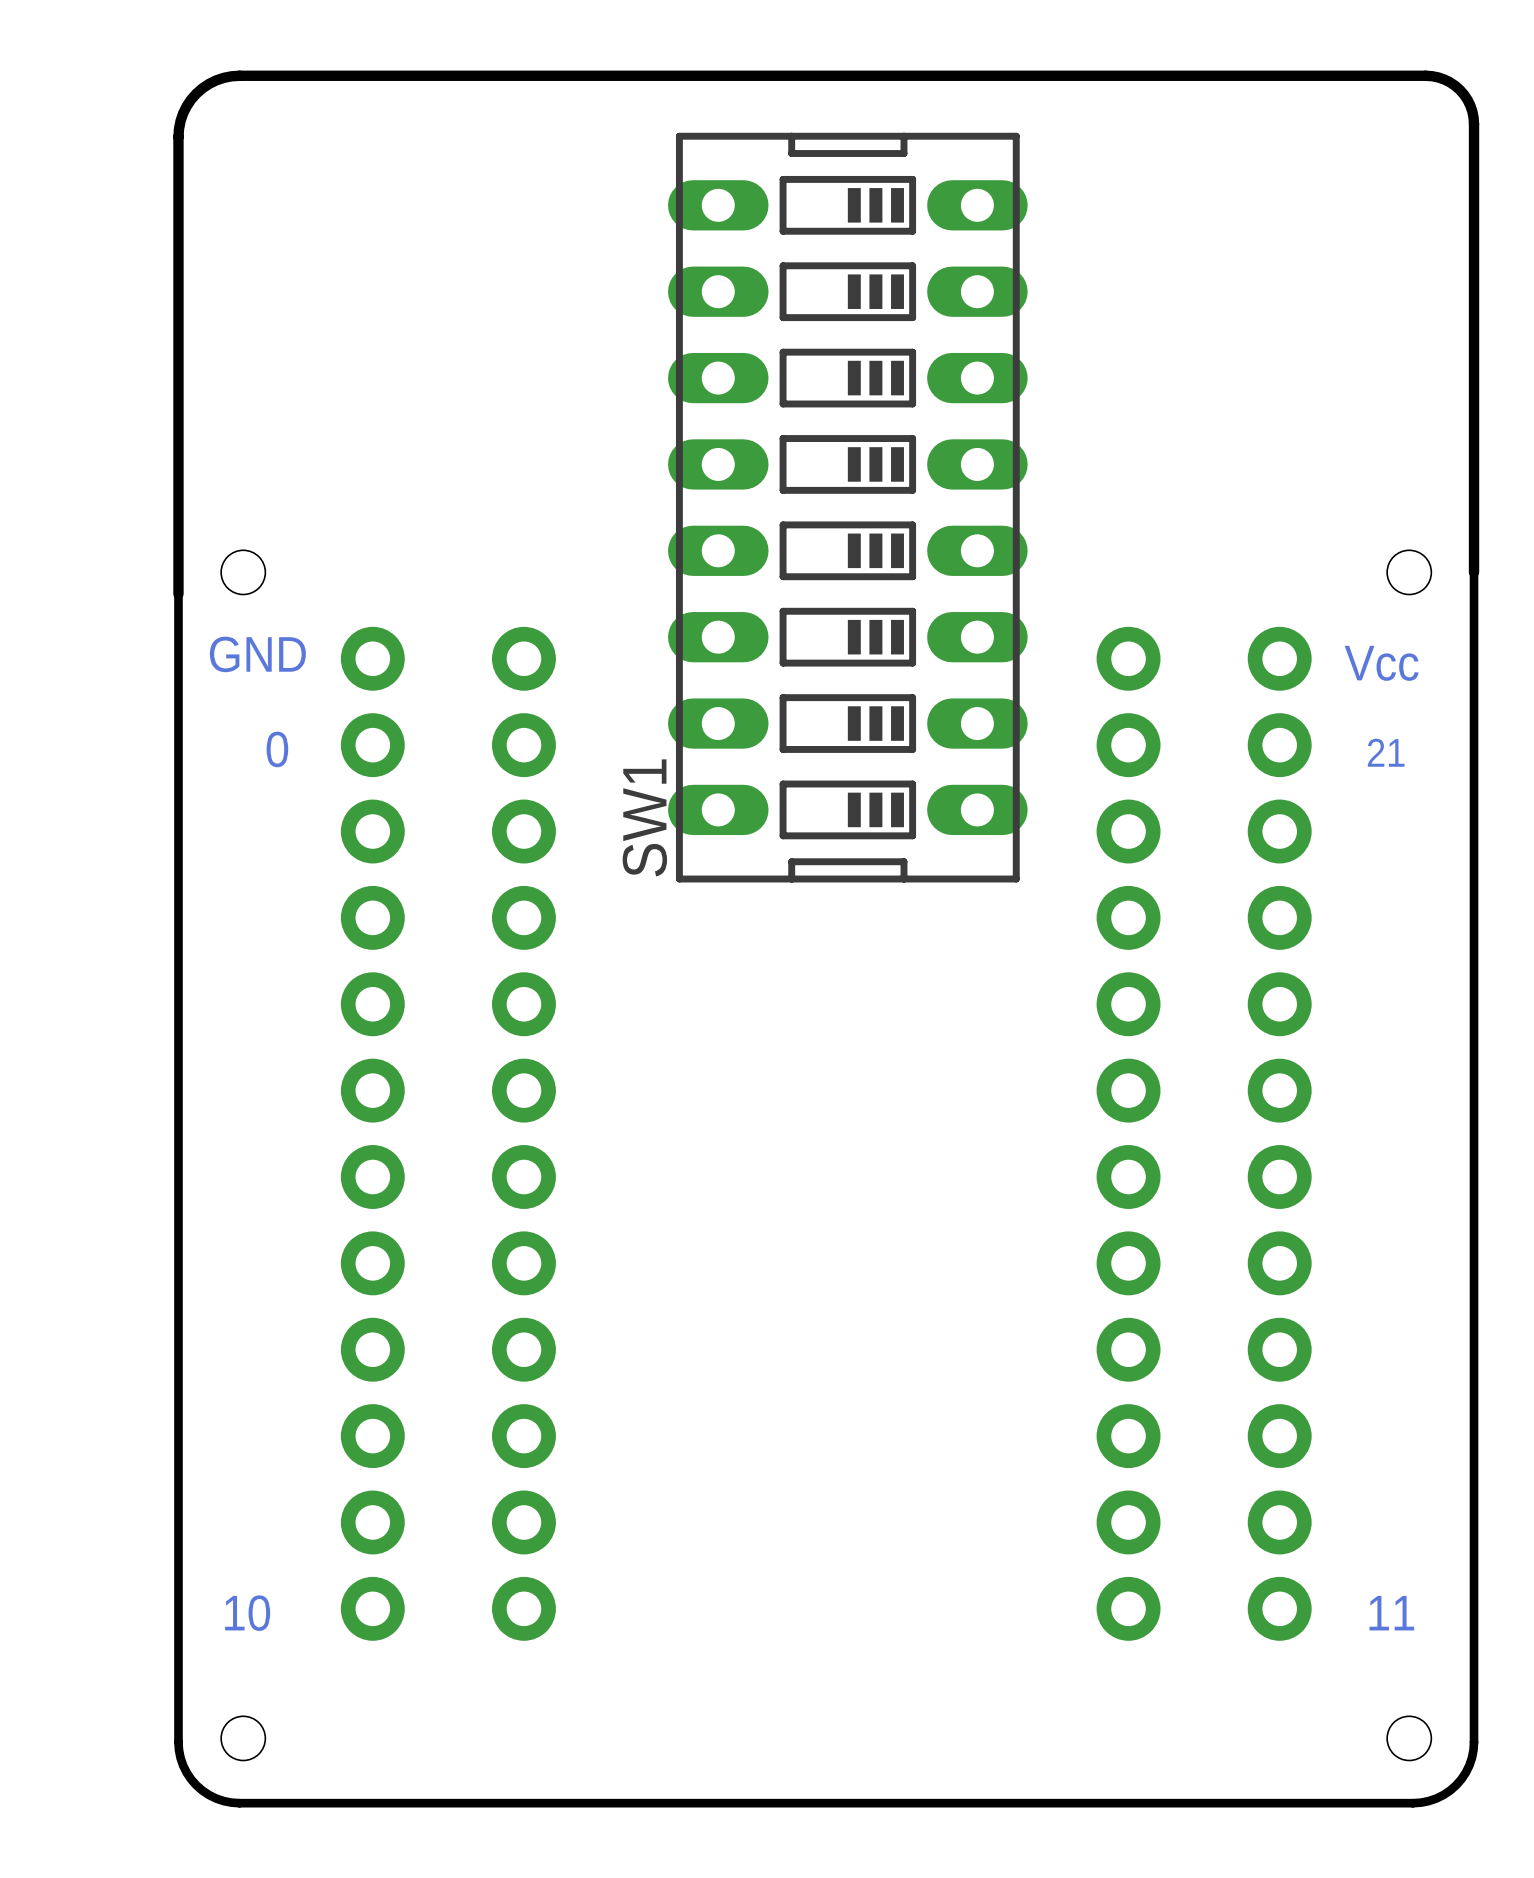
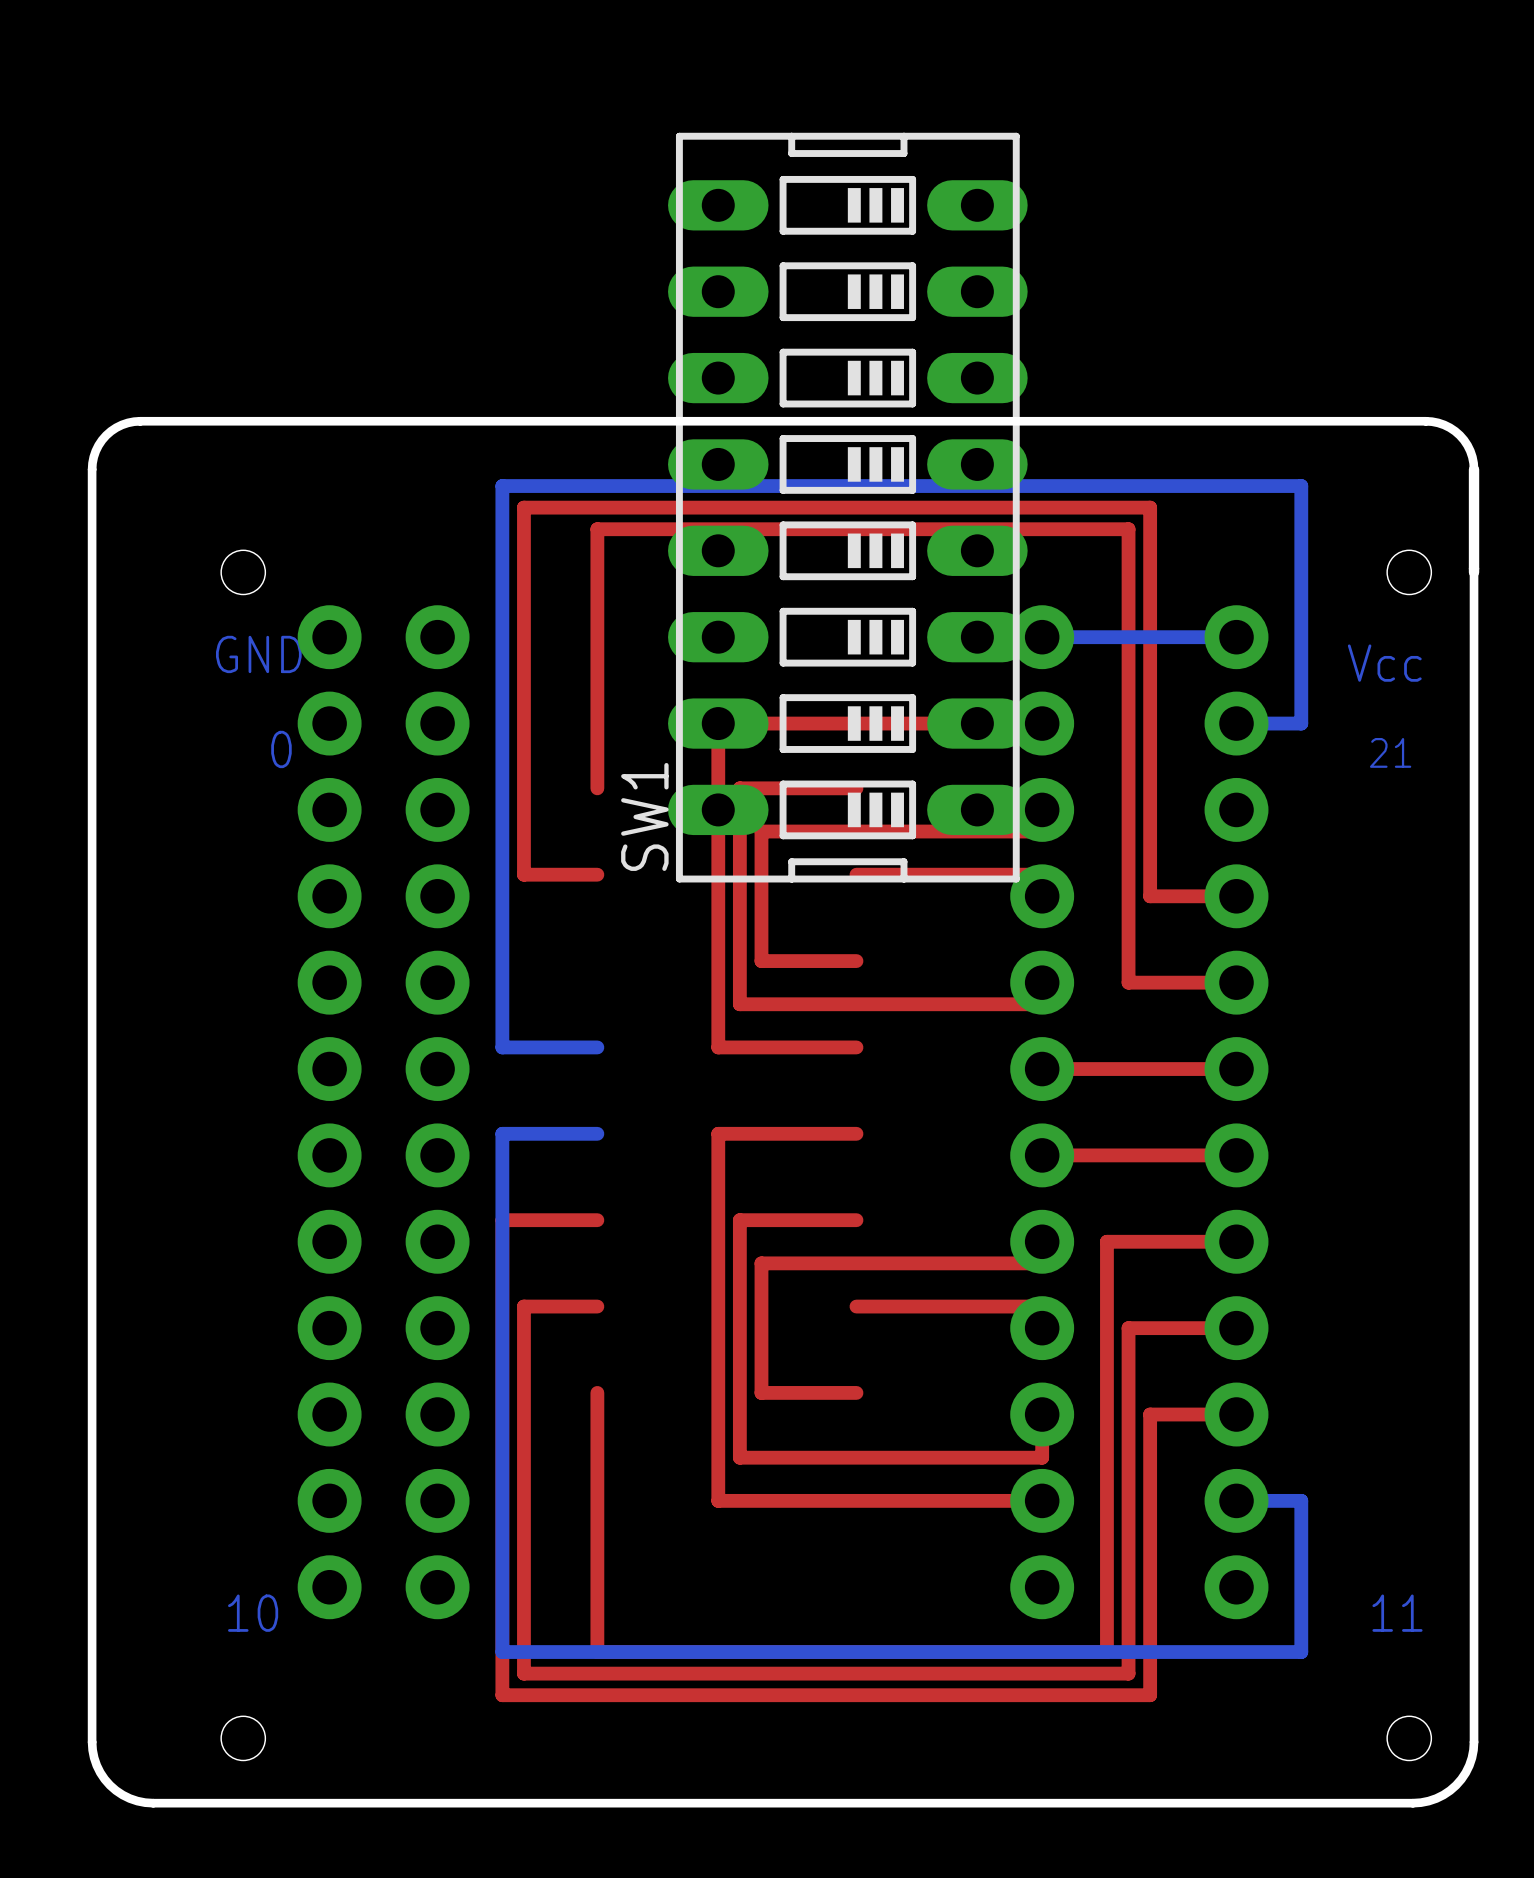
board edge: (1474, 469) (1473, 117) (1470, 105) (1464, 94) (1455, 85) (1438, 77) (1425, 75) (231, 76) (209, 83) (196, 93) (186, 106) (179, 128) (178, 594) -> (1474, 469) (1470, 451) (1459, 435) (1444, 424) (1425, 421) (140, 421) (121, 424) (106, 435) (95, 451) (92, 469) (92, 1750) (96, 1765) (104, 1779) (116, 1790) (129, 1798) (153, 1803) (239, 1803)
board edge: (178, 568) (178, 1742) (183, 1765) (196, 1785) (216, 1798) (239, 1803) -> none
bottom track: none -> (1236, 637) (1042, 637)
top track: none -> (1042, 723) (718, 723) (718, 1047) (856, 1047)
bottom track: none -> (1236, 723) (1301, 723) (1301, 486) (502, 486) (502, 1047) (597, 1047)
top track: none -> (597, 788) (597, 529) (1128, 529) (1128, 982) (1236, 982)
top track: none -> (856, 788) (739, 788) (739, 1004) (1042, 1004) (1042, 982)
top track: none -> (1042, 809) (1042, 831) (761, 831) (761, 961) (856, 961)
top track: none -> (597, 874) (523, 874) (523, 507) (1150, 507) (1150, 896) (1236, 896)
top track: none -> (856, 874) (1042, 874) (1042, 896)
top track: none -> (1236, 1069) (1042, 1069)
part: none -> (329, 1112)
part: none -> (437, 1112)
part: none -> (1042, 1112)
part: (372, 1133) -> none
part: (523, 1133) -> none
bottom track: none -> (597, 1133) (502, 1133) (502, 1652) (1301, 1652) (1301, 1500) (1236, 1500)
top track: none -> (856, 1133) (718, 1133) (718, 1500) (1042, 1500)
part: (1128, 1133) -> none
part position: (1279, 1133) -> (1236, 1112)
top track: none -> (1236, 1155) (1042, 1155)
top track: none -> (597, 1220) (502, 1220) (502, 1695) (1150, 1695) (1150, 1414) (1236, 1414)
top track: none -> (856, 1220) (739, 1220) (739, 1457) (1042, 1457) (1042, 1414)
top track: none -> (1042, 1241) (1042, 1263) (761, 1263) (761, 1392) (856, 1392)
top track: none -> (1236, 1241) (1106, 1241) (1106, 1652) (597, 1652) (597, 1392)
top track: none -> (597, 1306) (523, 1306) (523, 1673) (1128, 1673) (1128, 1328) (1236, 1328)
top track: none -> (856, 1306) (1042, 1306) (1042, 1328)

